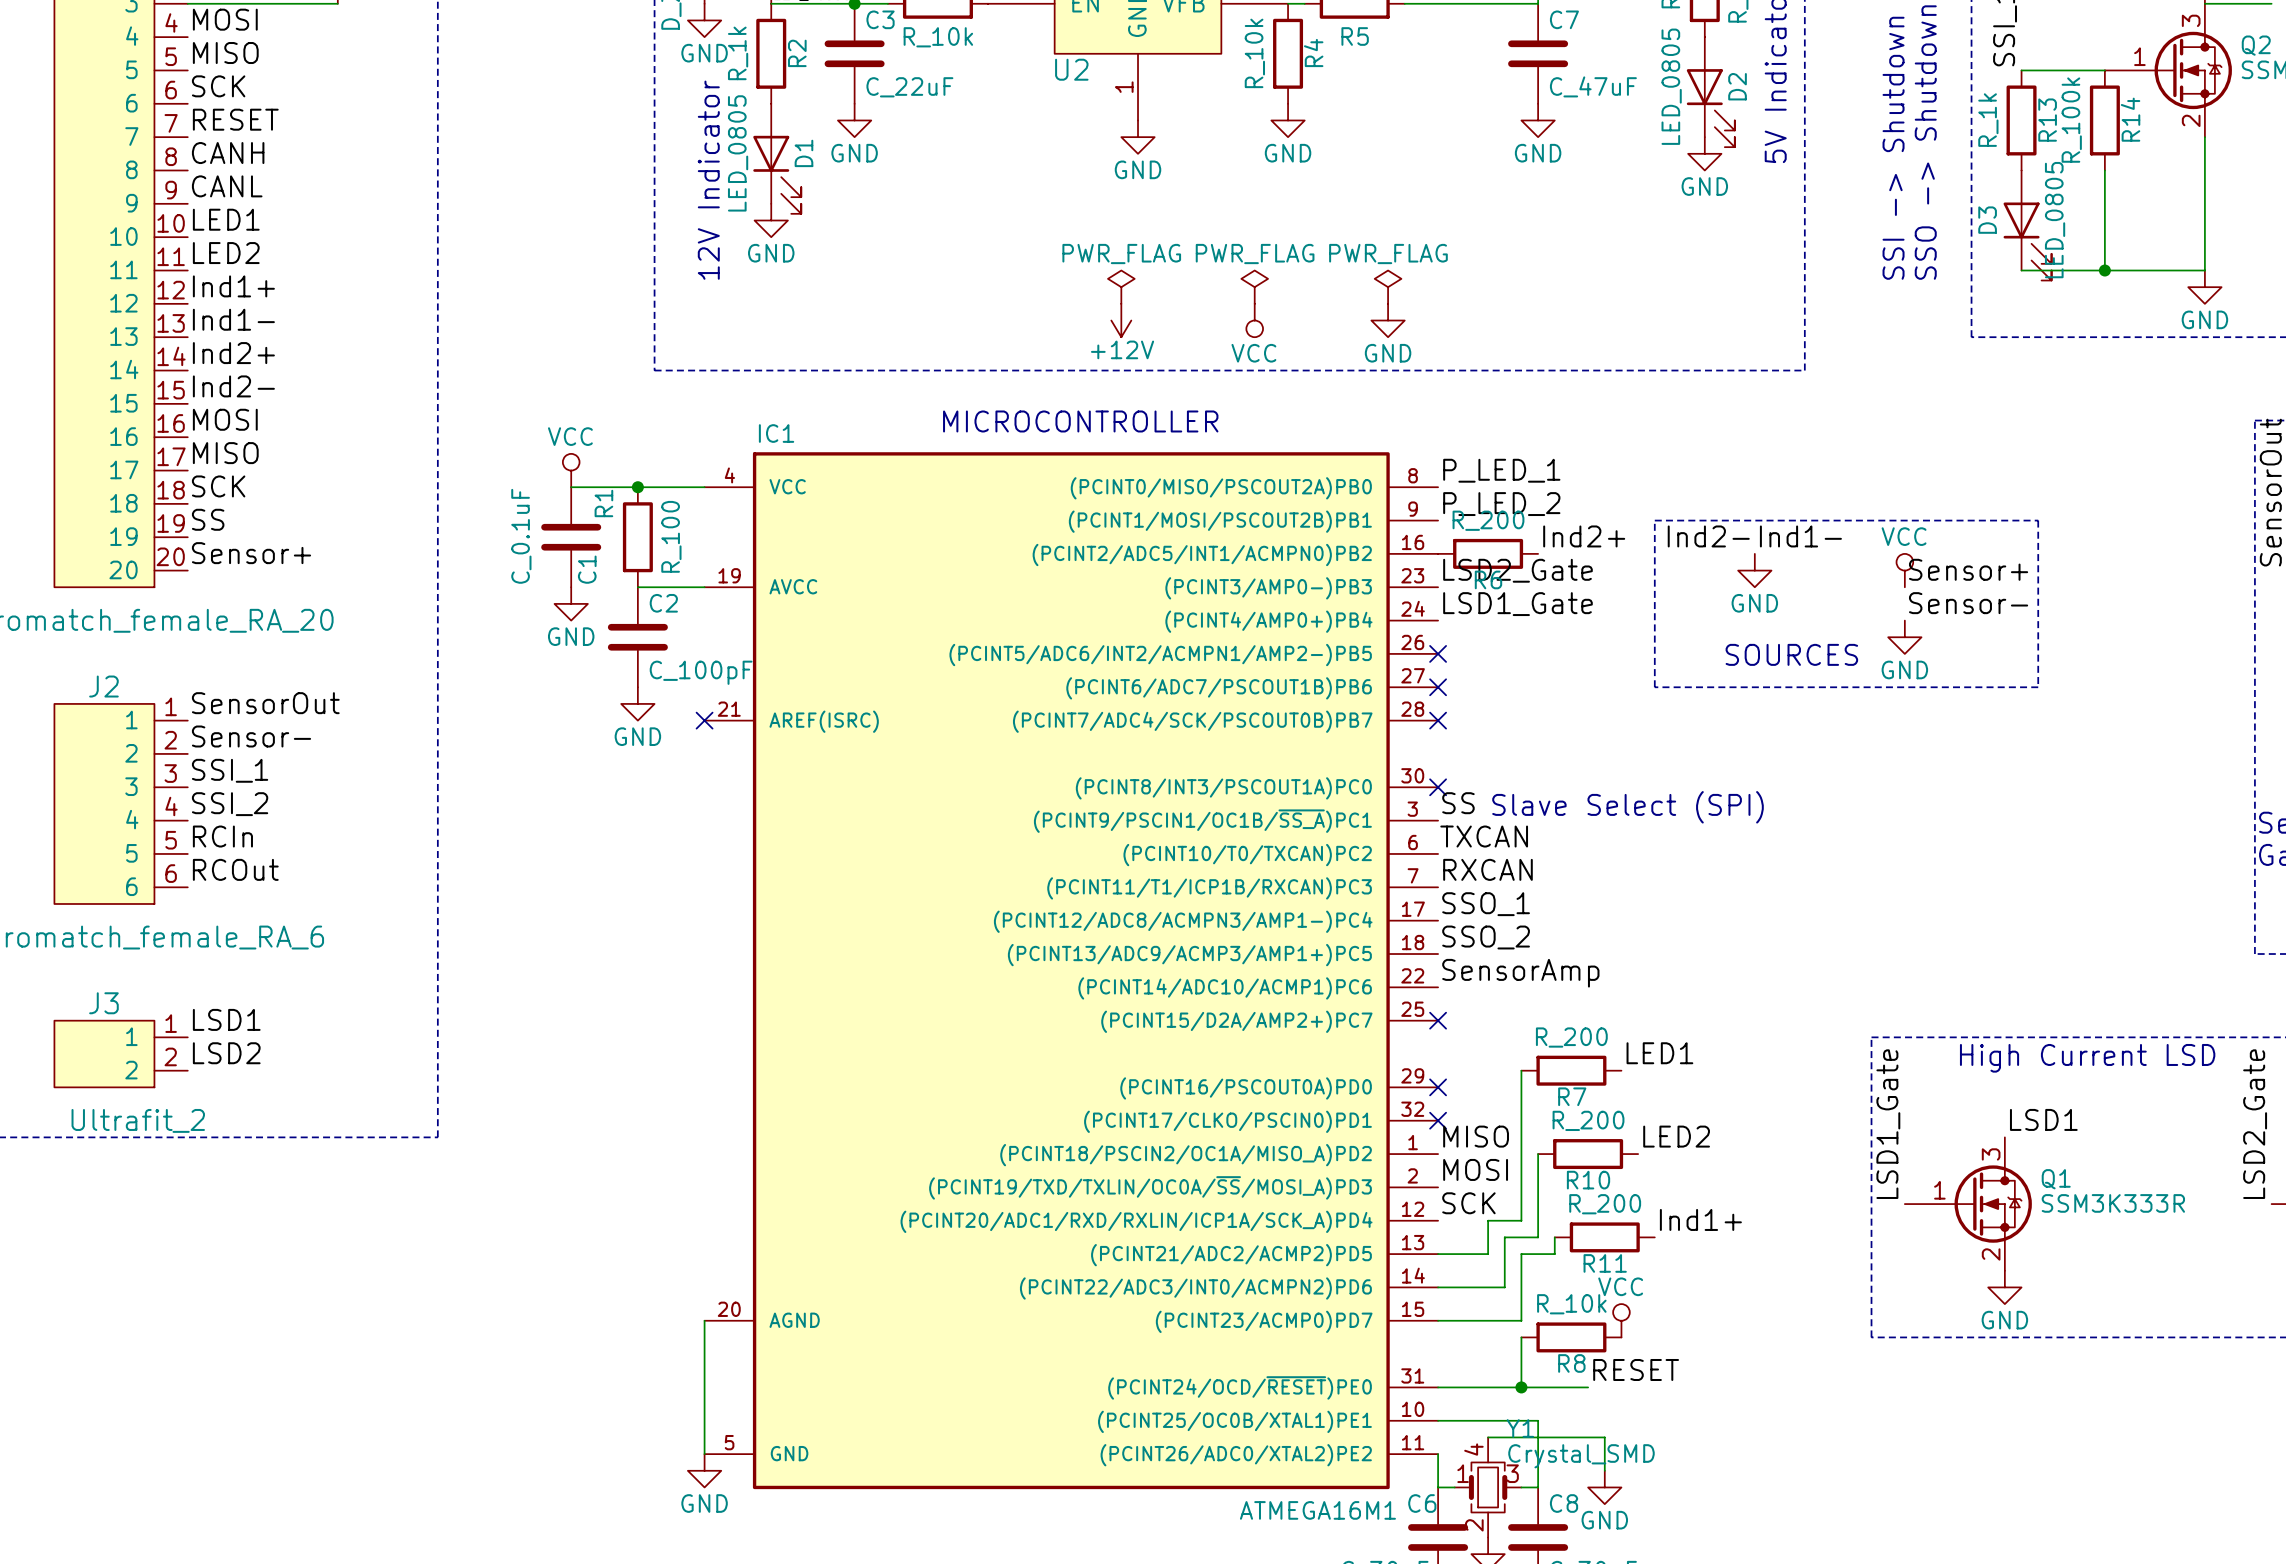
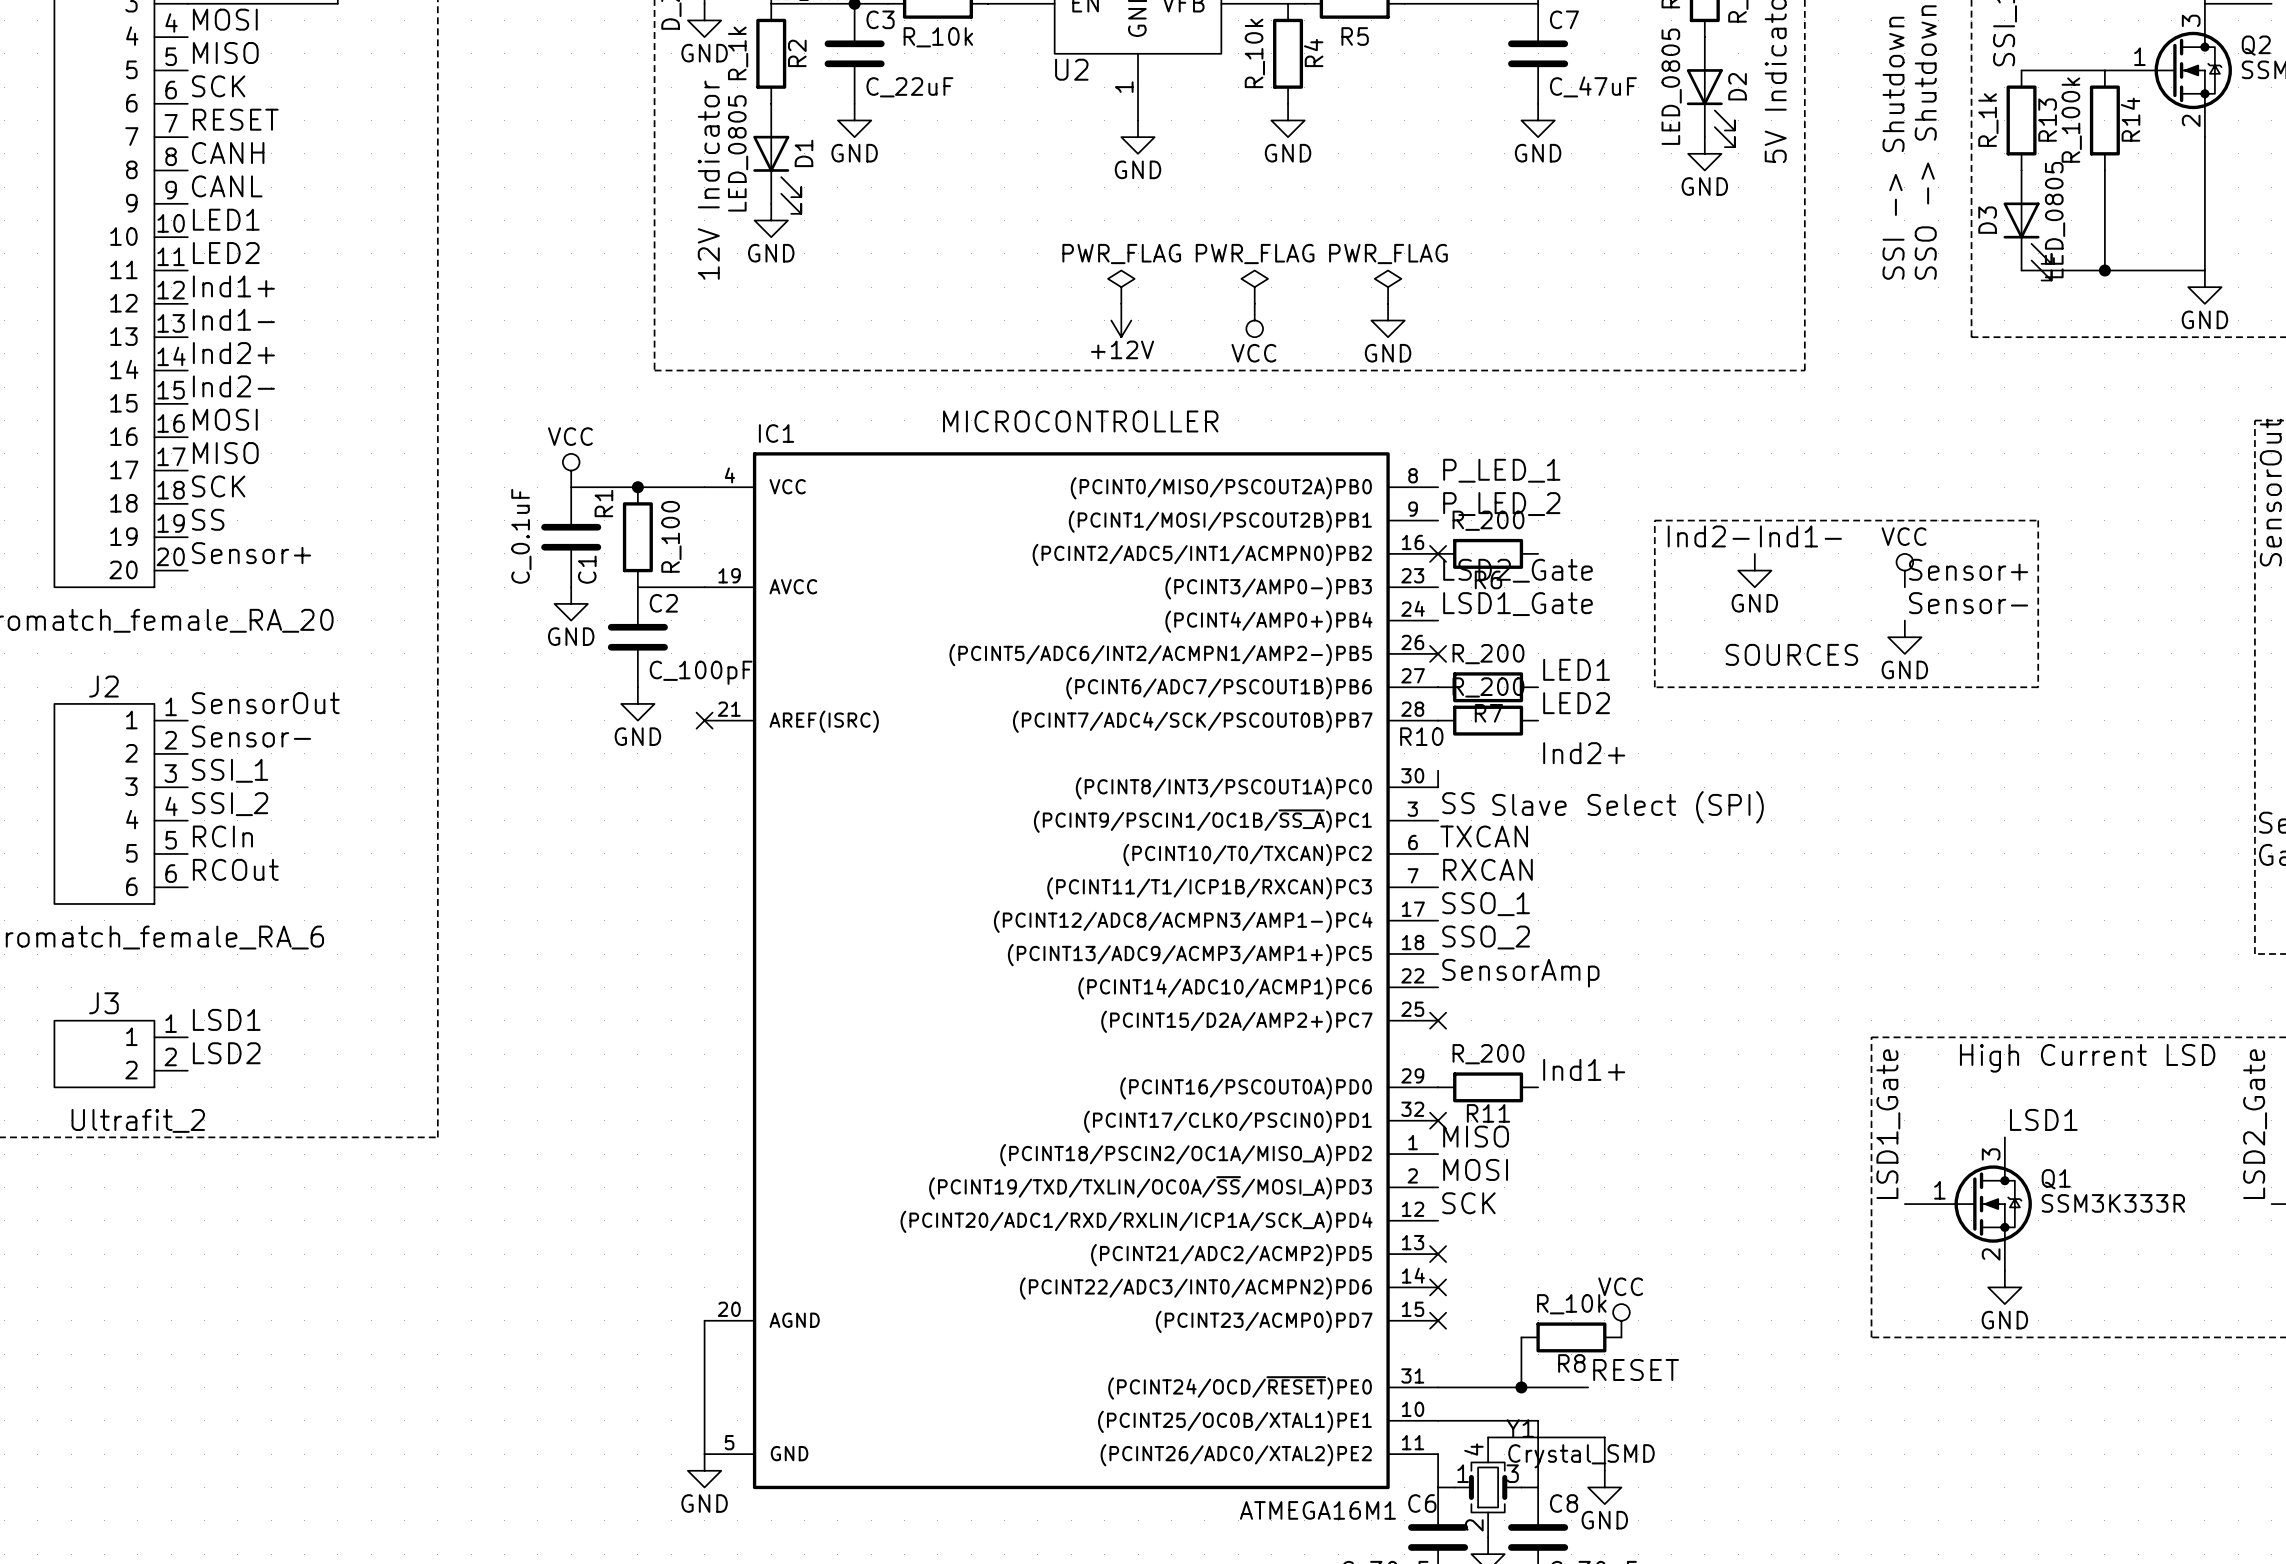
label position: Ind2+ (1584, 536) -> Ind2+ (1584, 753)
no-connect mark: none -> (1438, 553)
label: none -> LED1 (1576, 669)
no-connect mark: (1438, 687) -> none
label: none -> LED2 (1576, 703)
no-connect mark: (1438, 720) -> none
wire: none -> (1438, 770) (1438, 787)
no-connect mark: (1438, 787) -> none
label: LED1 (1659, 1053) -> none
wire: (1521, 1070) (1521, 1220) (1488, 1220) (1488, 1254) (1438, 1254) -> none
R7 position: (1571, 1070) -> (1488, 687)
no-connect mark: (1438, 1087) -> none
label: LED2 (1676, 1136) -> none
wire: (1538, 1154) (1538, 1237) (1504, 1237) (1504, 1287) (1438, 1287) -> none
R10 position: (1588, 1154) -> (1488, 720)
R10 name position: R10 (1588, 1180) -> R10 (1421, 736)
label position: Ind1+ (1700, 1219) -> Ind1+ (1584, 1069)
wire: (1554, 1237) (1554, 1254) (1521, 1254) (1521, 1320) (1438, 1320) -> none
R11 position: (1604, 1237) -> (1488, 1087)
no-connect mark: none -> (1438, 1254)
no-connect mark: none -> (1438, 1287)
no-connect mark: none -> (1438, 1320)

